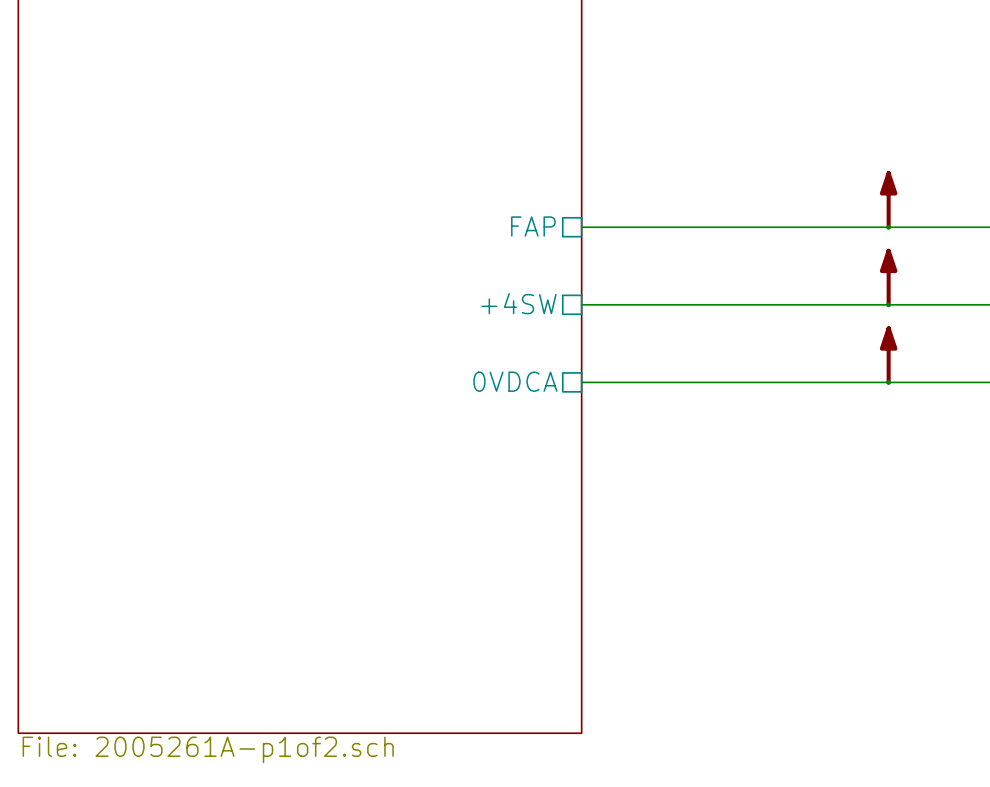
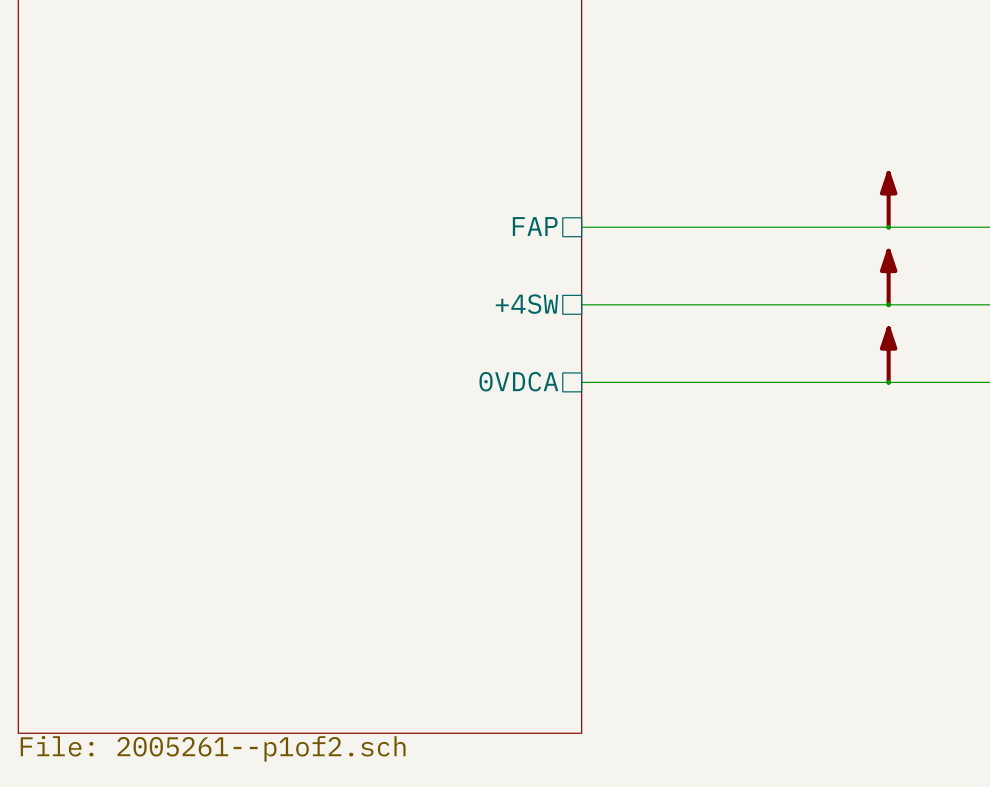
sheet value: File: 2005261A-p1of2.sch (208, 749) -> File: 2005261--p1of2.sch (213, 748)

